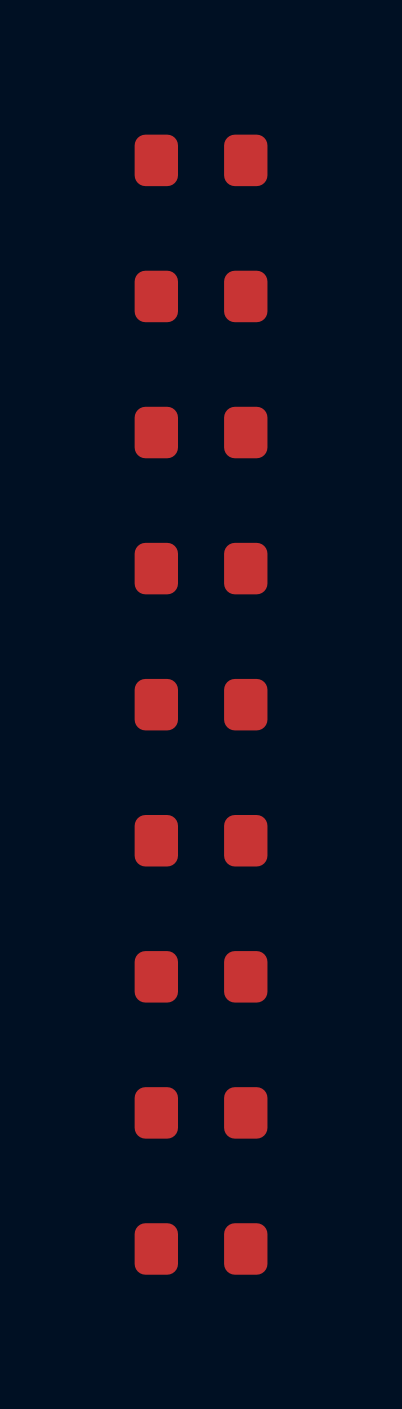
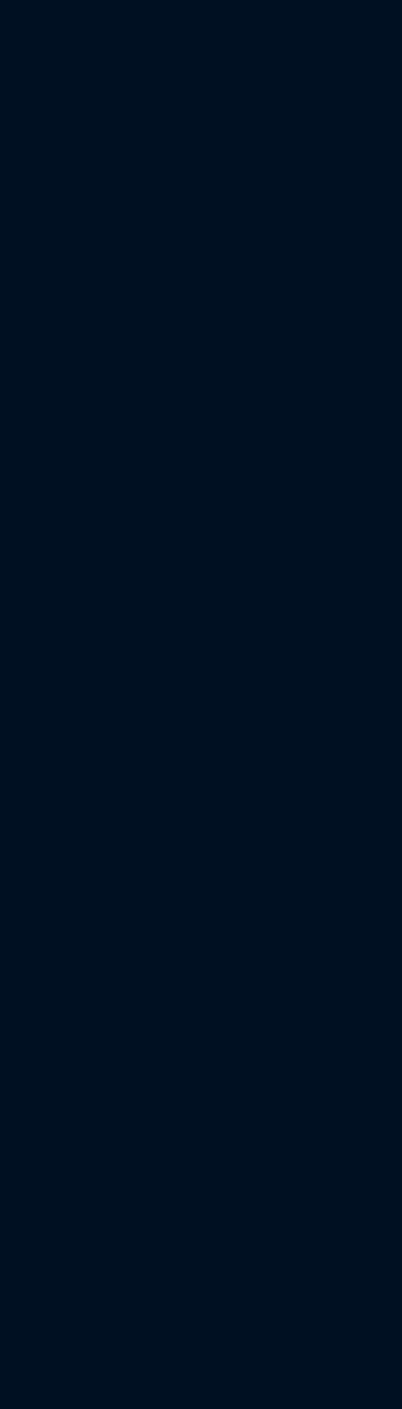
part: (201, 160) -> none
part: (201, 296) -> none
part: (201, 432) -> none
part: (201, 568) -> none
part: (201, 704) -> none
part: (201, 840) -> none
part: (201, 976) -> none
part: (201, 1112) -> none
part: (201, 1248) -> none

